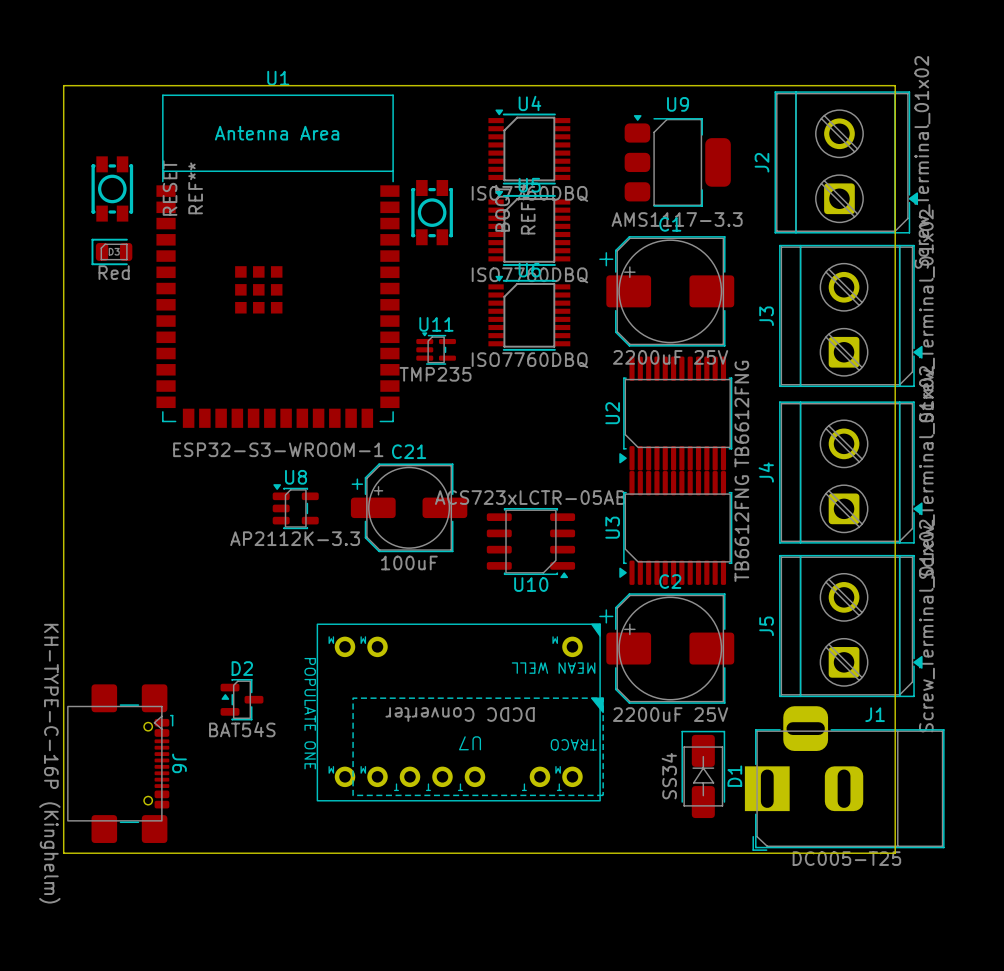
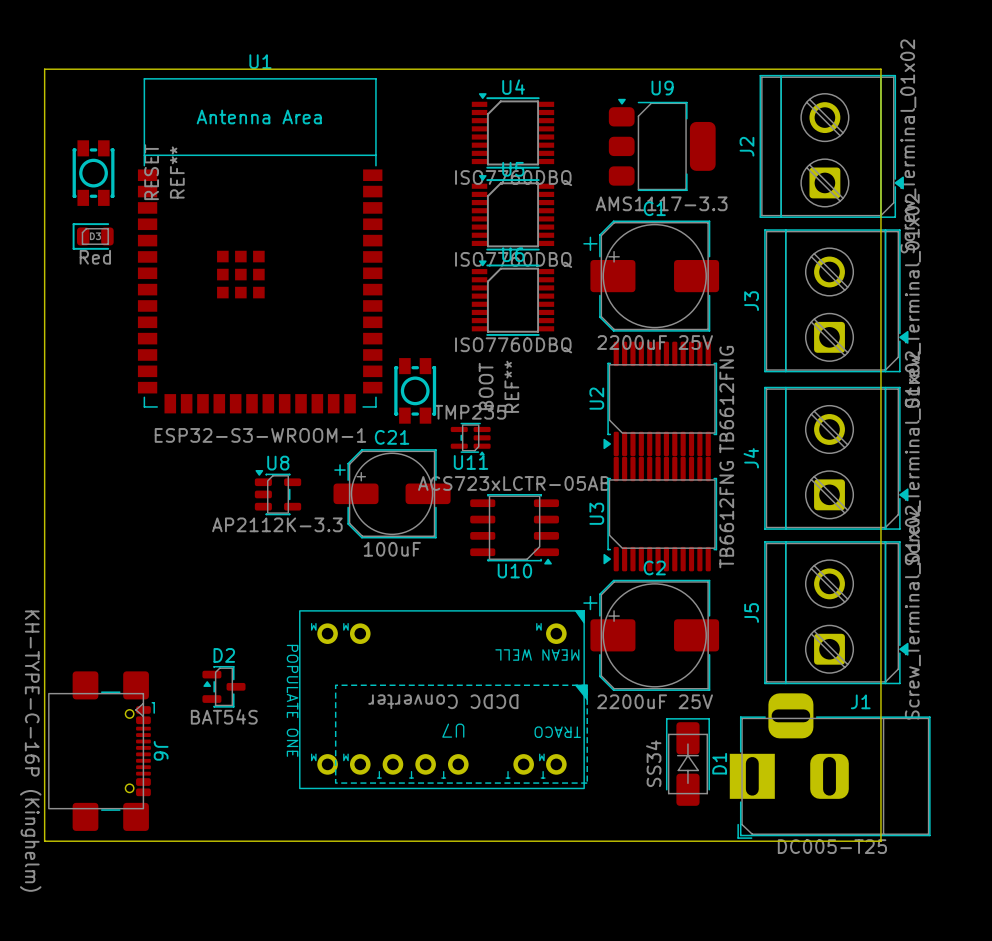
part position: (432, 212) -> (415, 391)
U11 rotation: 0° (436, 348) -> 180° (470, 439)
U11 position: (436, 348) -> (470, 439)

